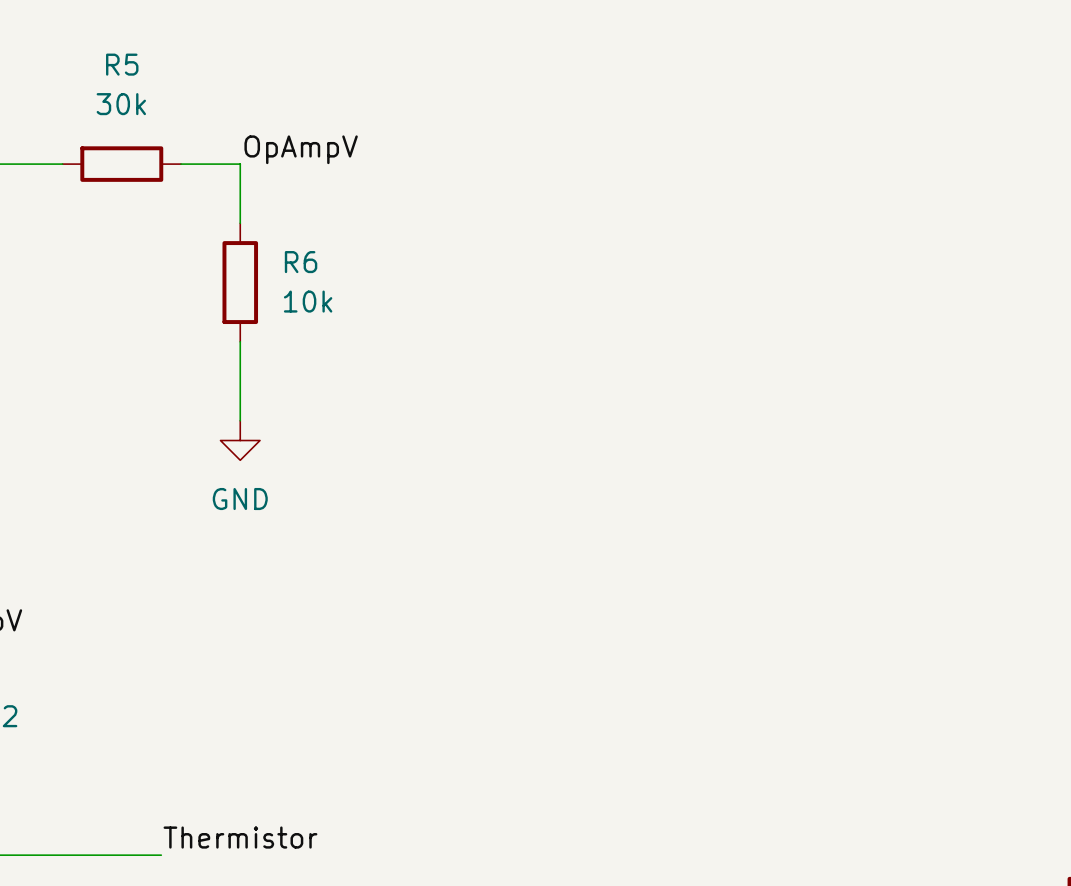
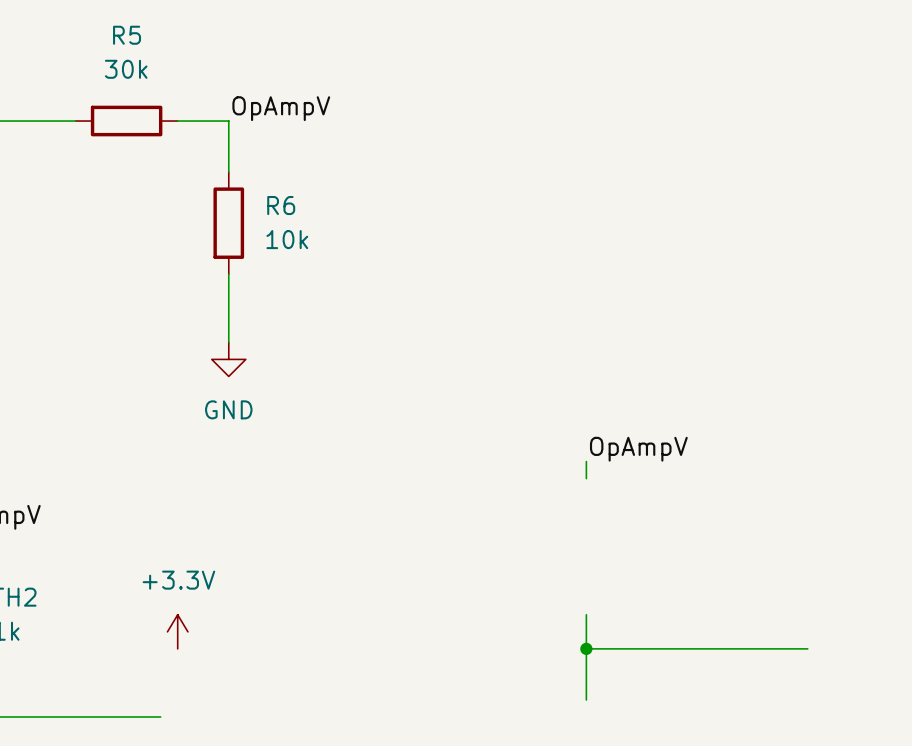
label: none -> OpAmpV (638, 449)
wire: none -> (586, 461) (586, 478)
wire: none -> (586, 614) (586, 699)
power symbol: none -> +3.3V (177, 631)
wire: none -> (586, 648) (807, 648)
junction: none -> (586, 648)
label: Thermistor (240, 837) -> none

